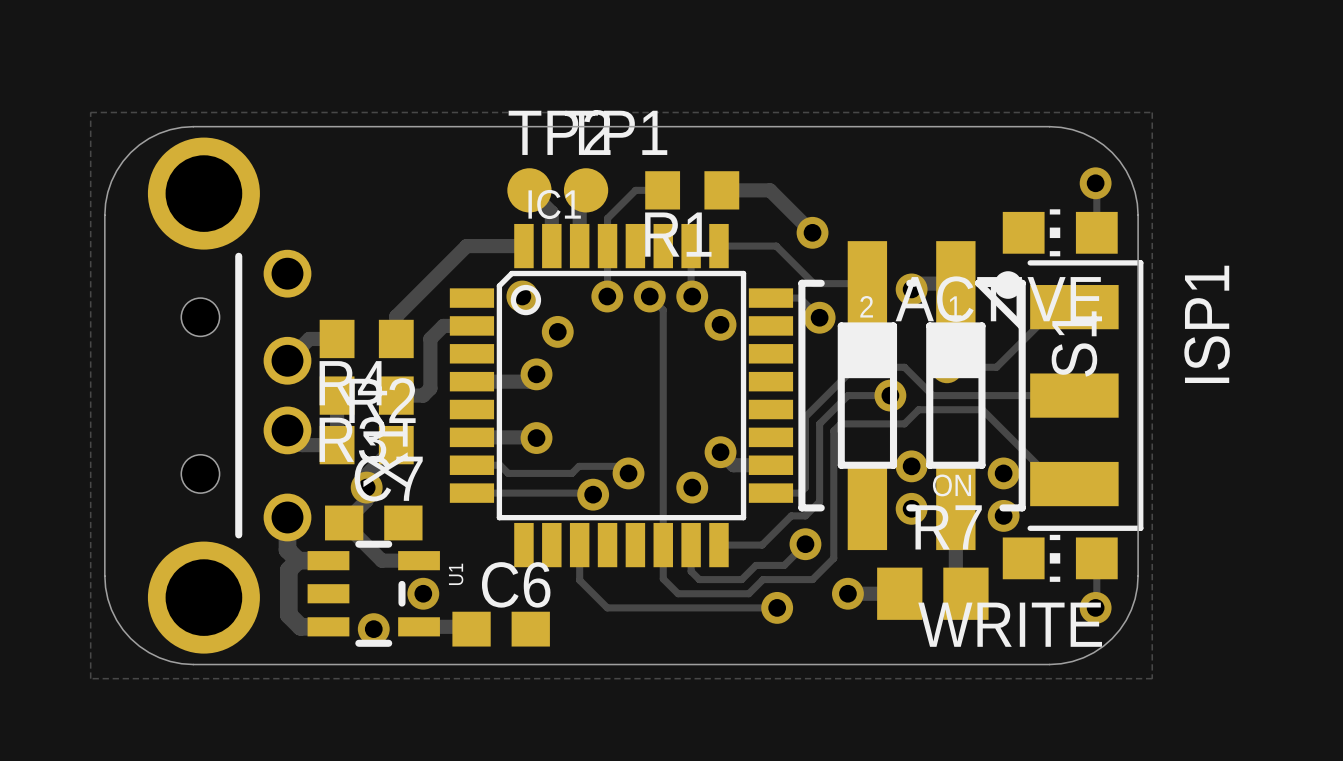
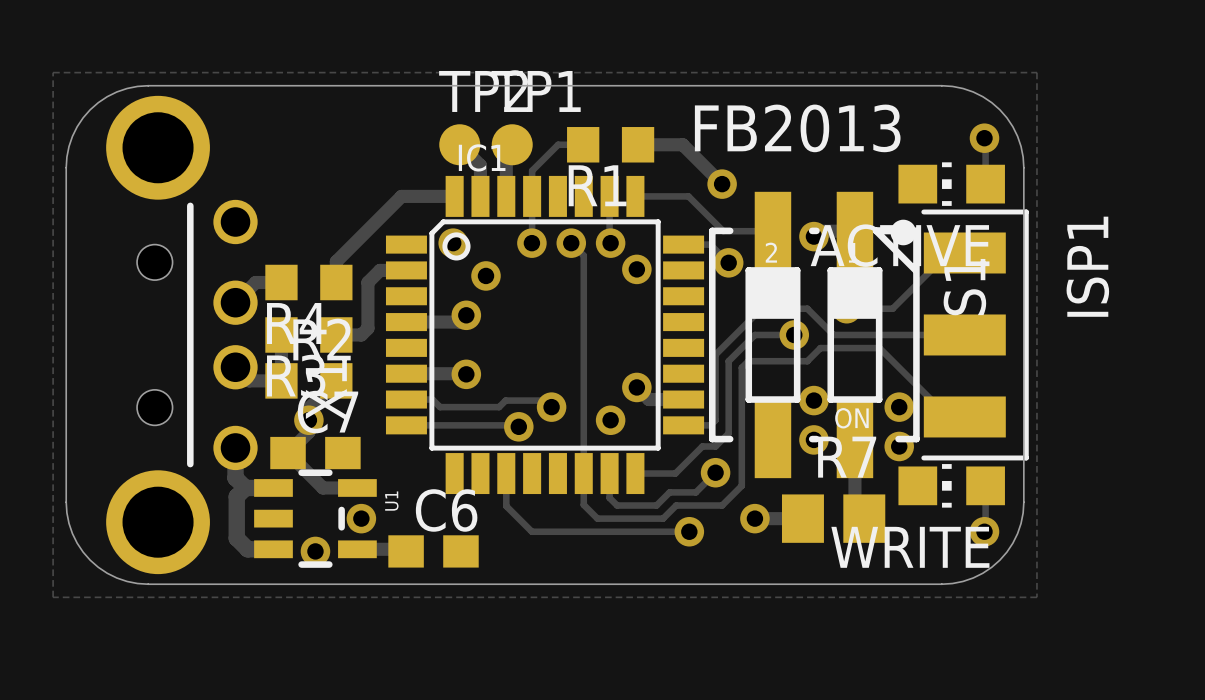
text: none -> FB2013 (797, 128)

